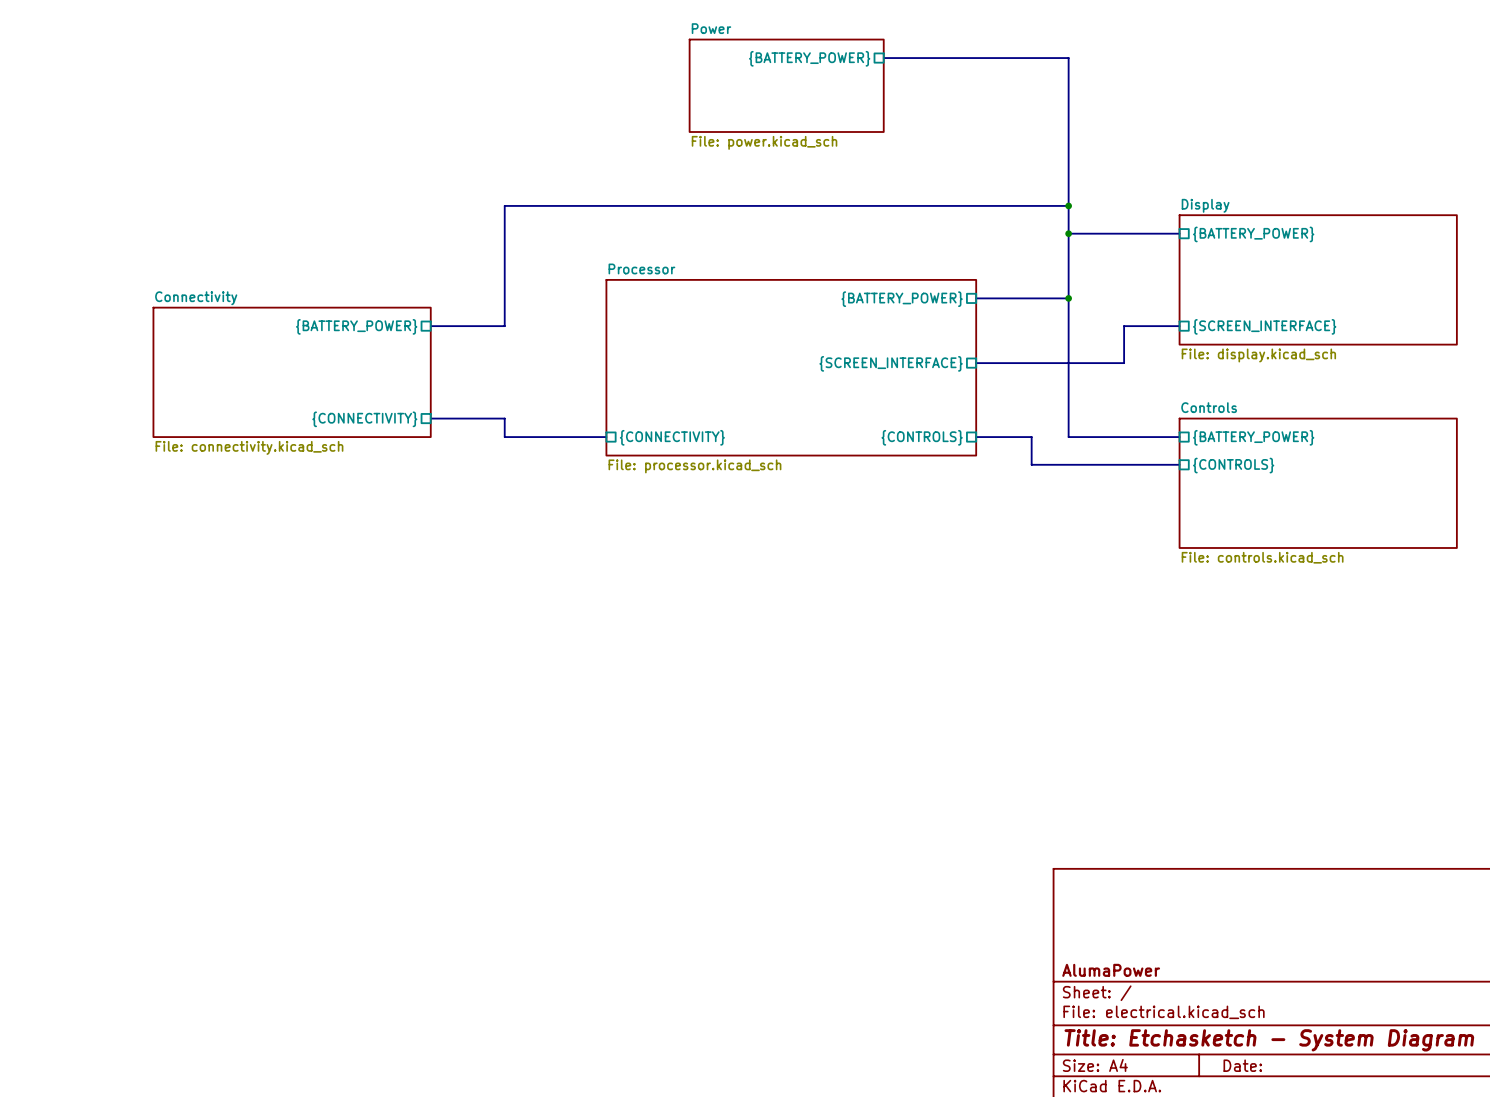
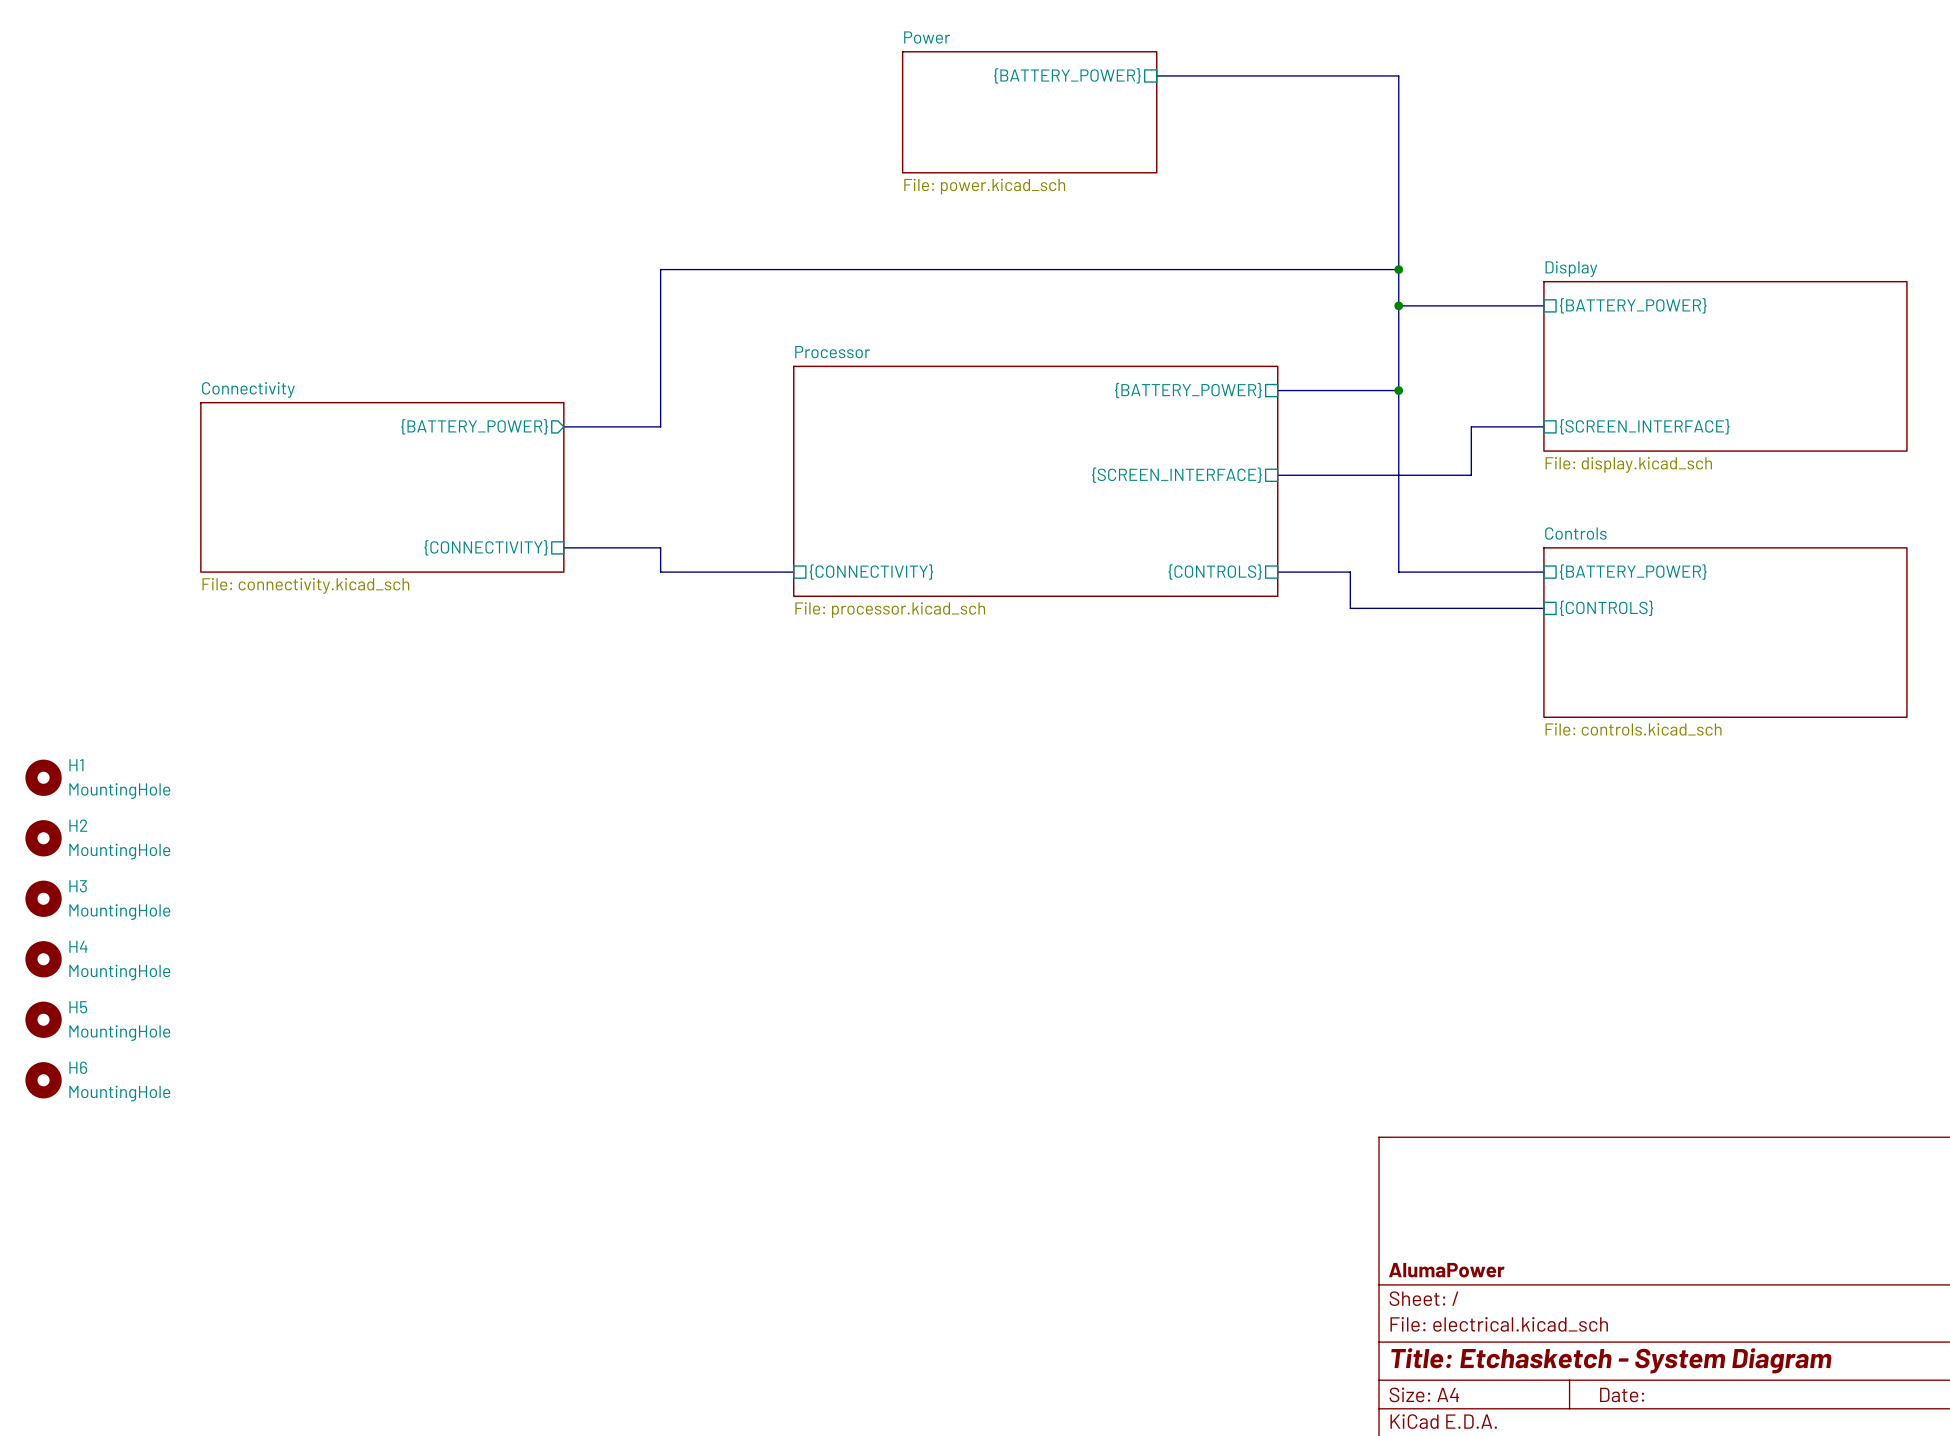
sheet pin shape: passive (356, 326) -> output (474, 426)
H1: none -> MountingHole (43, 777)
H2: none -> MountingHole (43, 838)
H3: none -> MountingHole (43, 898)
H4: none -> MountingHole (43, 959)
H5: none -> MountingHole (43, 1019)
H6: none -> MountingHole (43, 1080)

